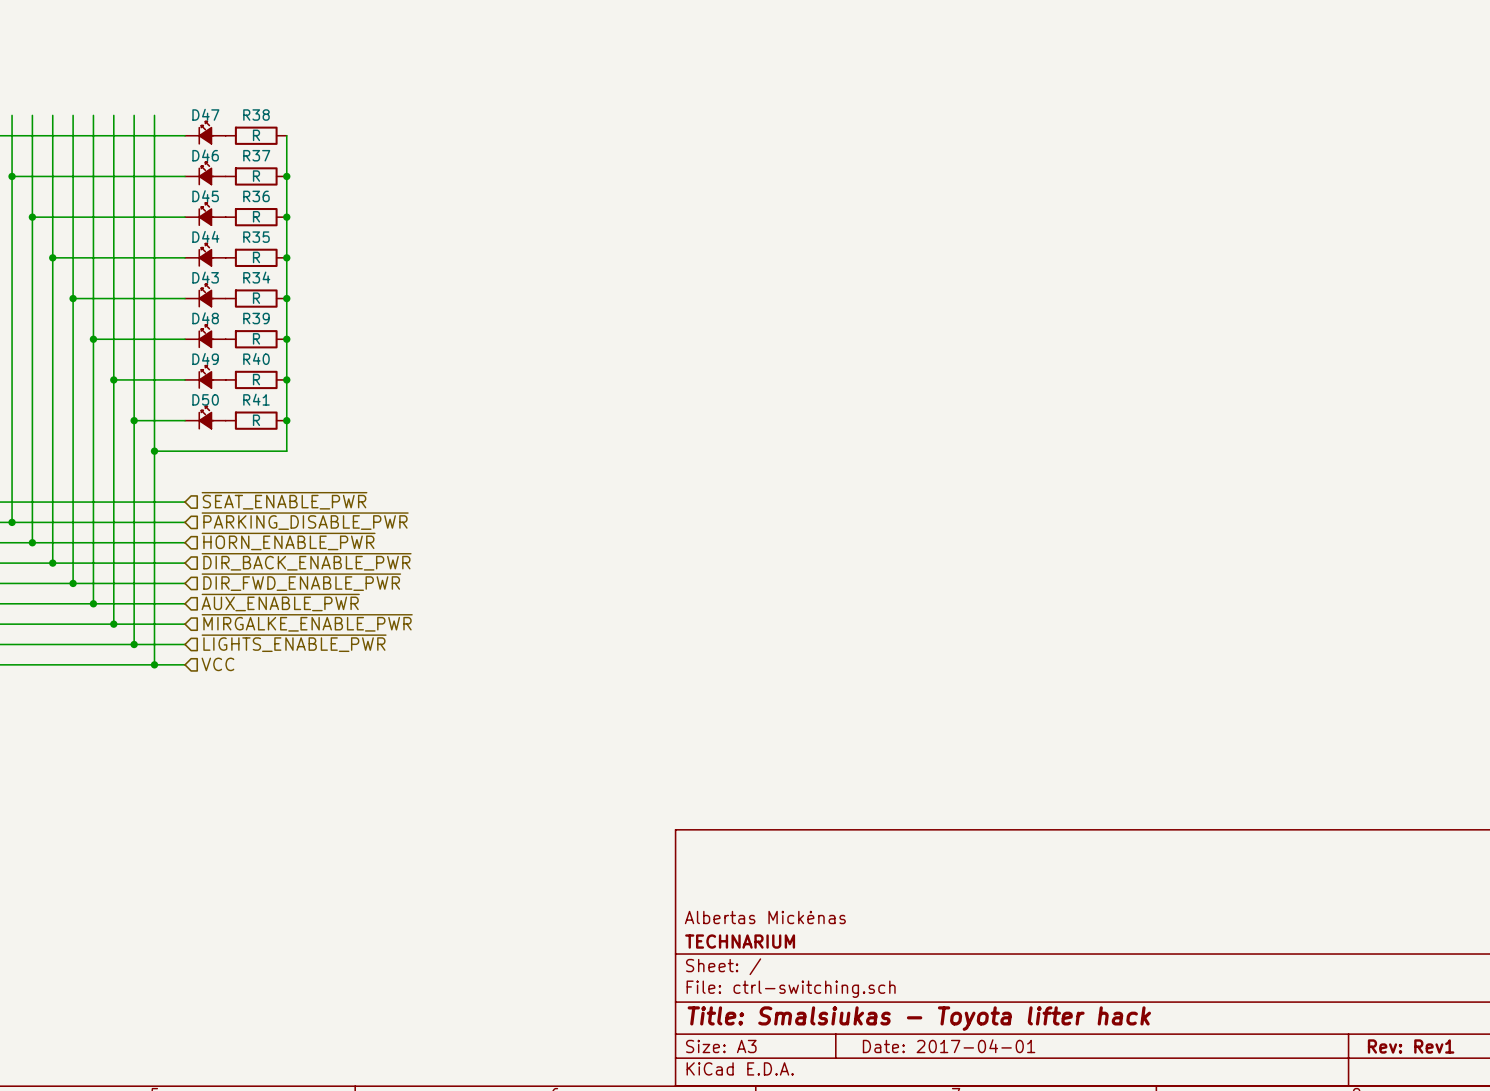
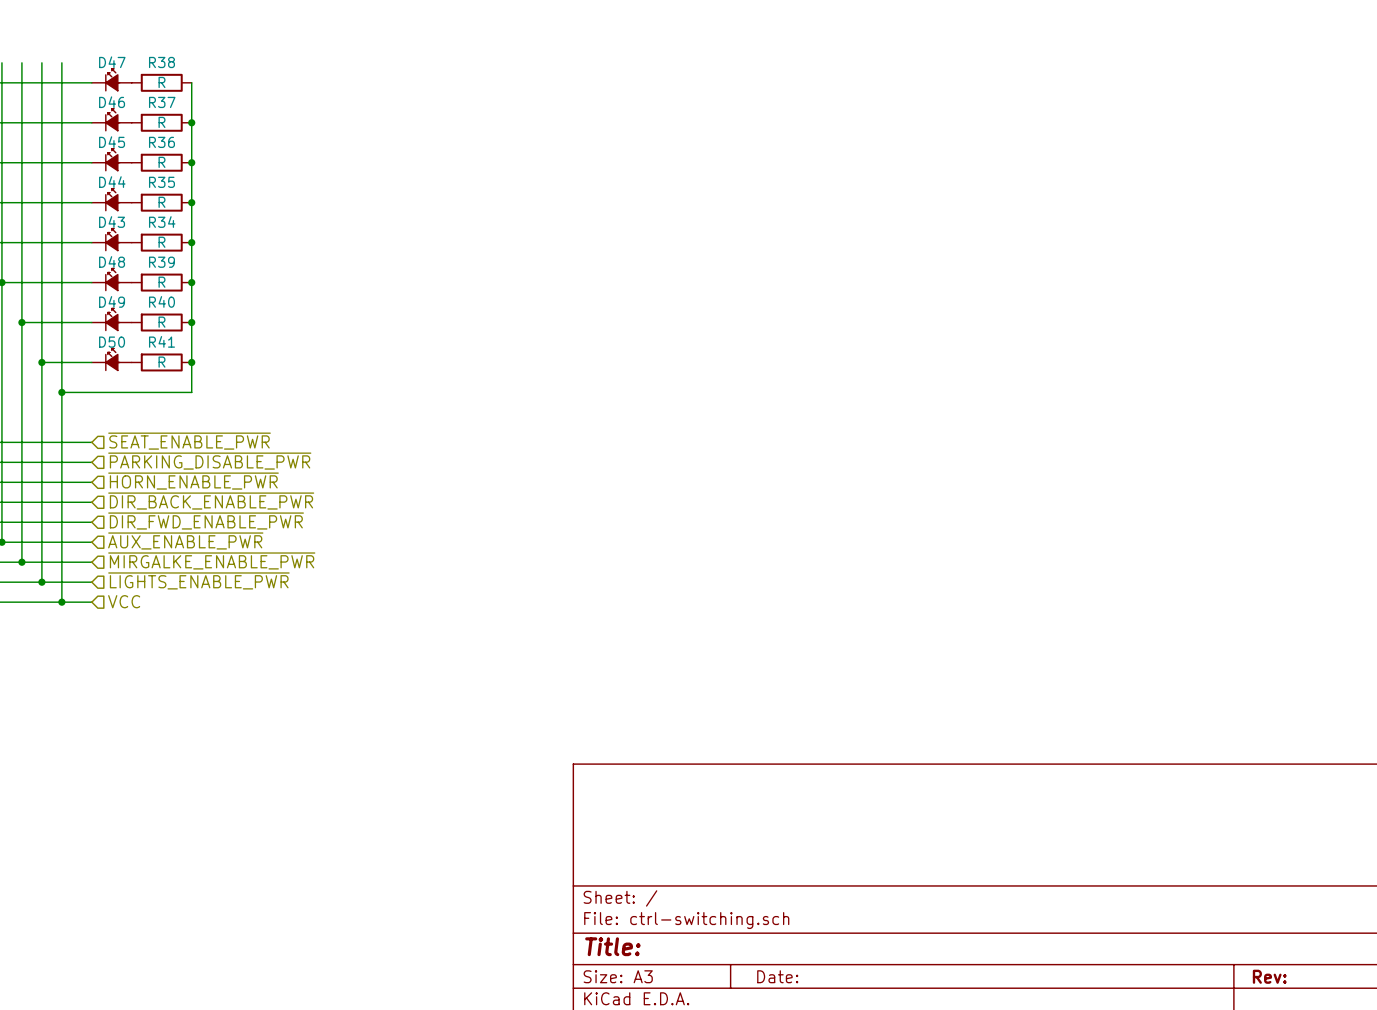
title block: Albertas Mickėnas (765, 917) -> none
title block: TECHNARIUM (740, 941) -> none
title block: Title: Smalsiukas - Toyota lifter hack (919, 1018) -> Title: (612, 946)
title block: Date: 2017-04-01 (949, 1046) -> Date: (777, 976)
title block: Rev: Rev1 (1411, 1046) -> Rev: (1269, 976)

